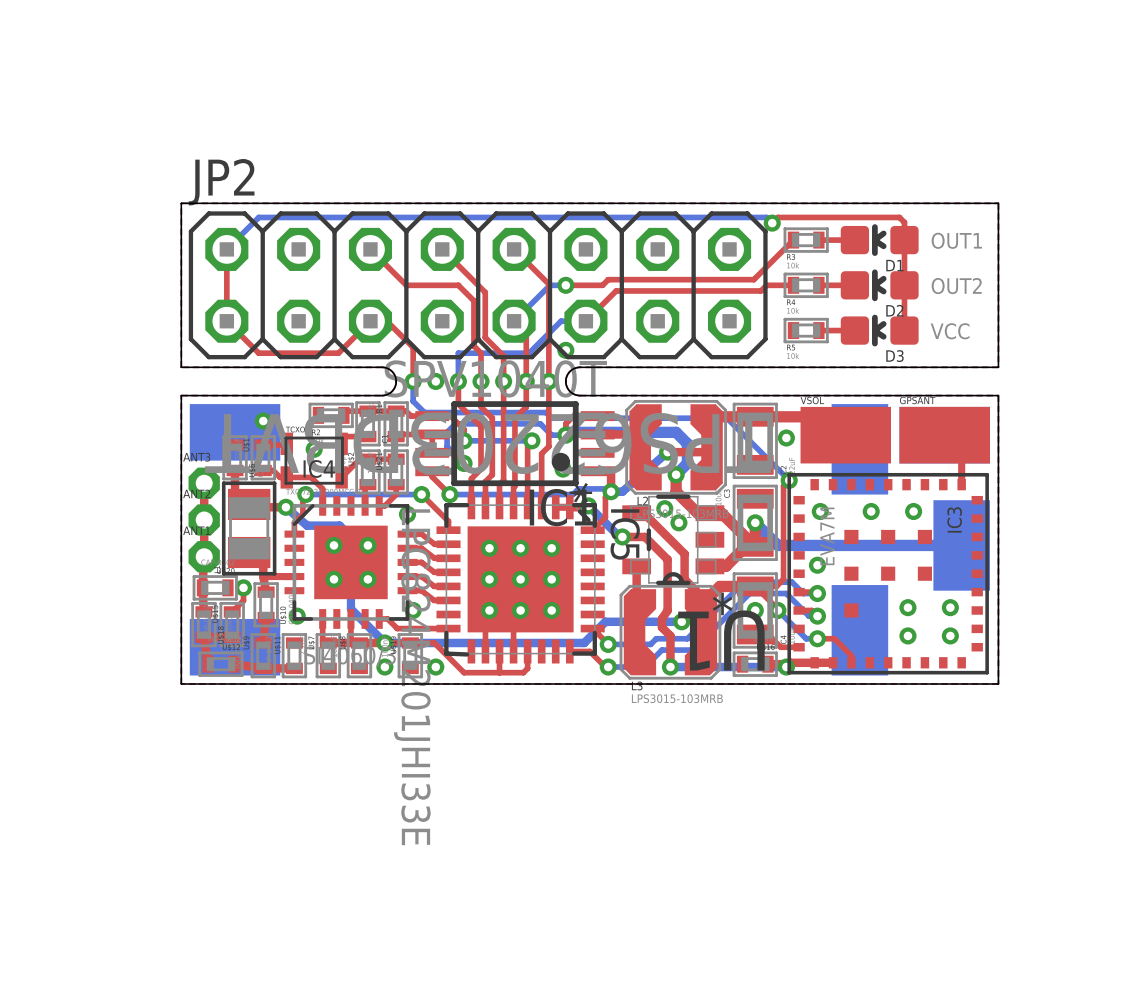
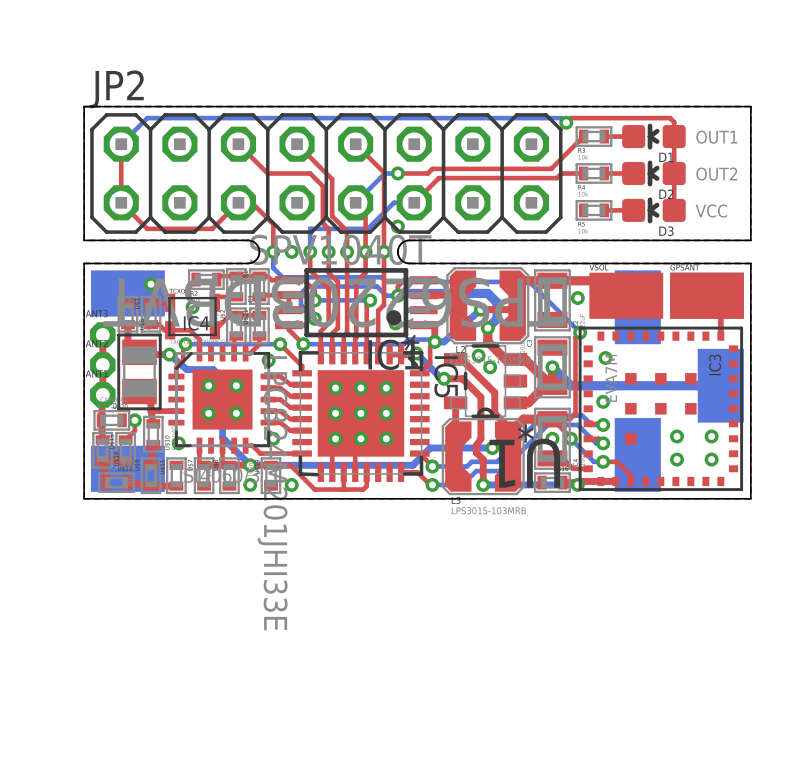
via: (871, 511) -> none
via: (913, 511) -> none

